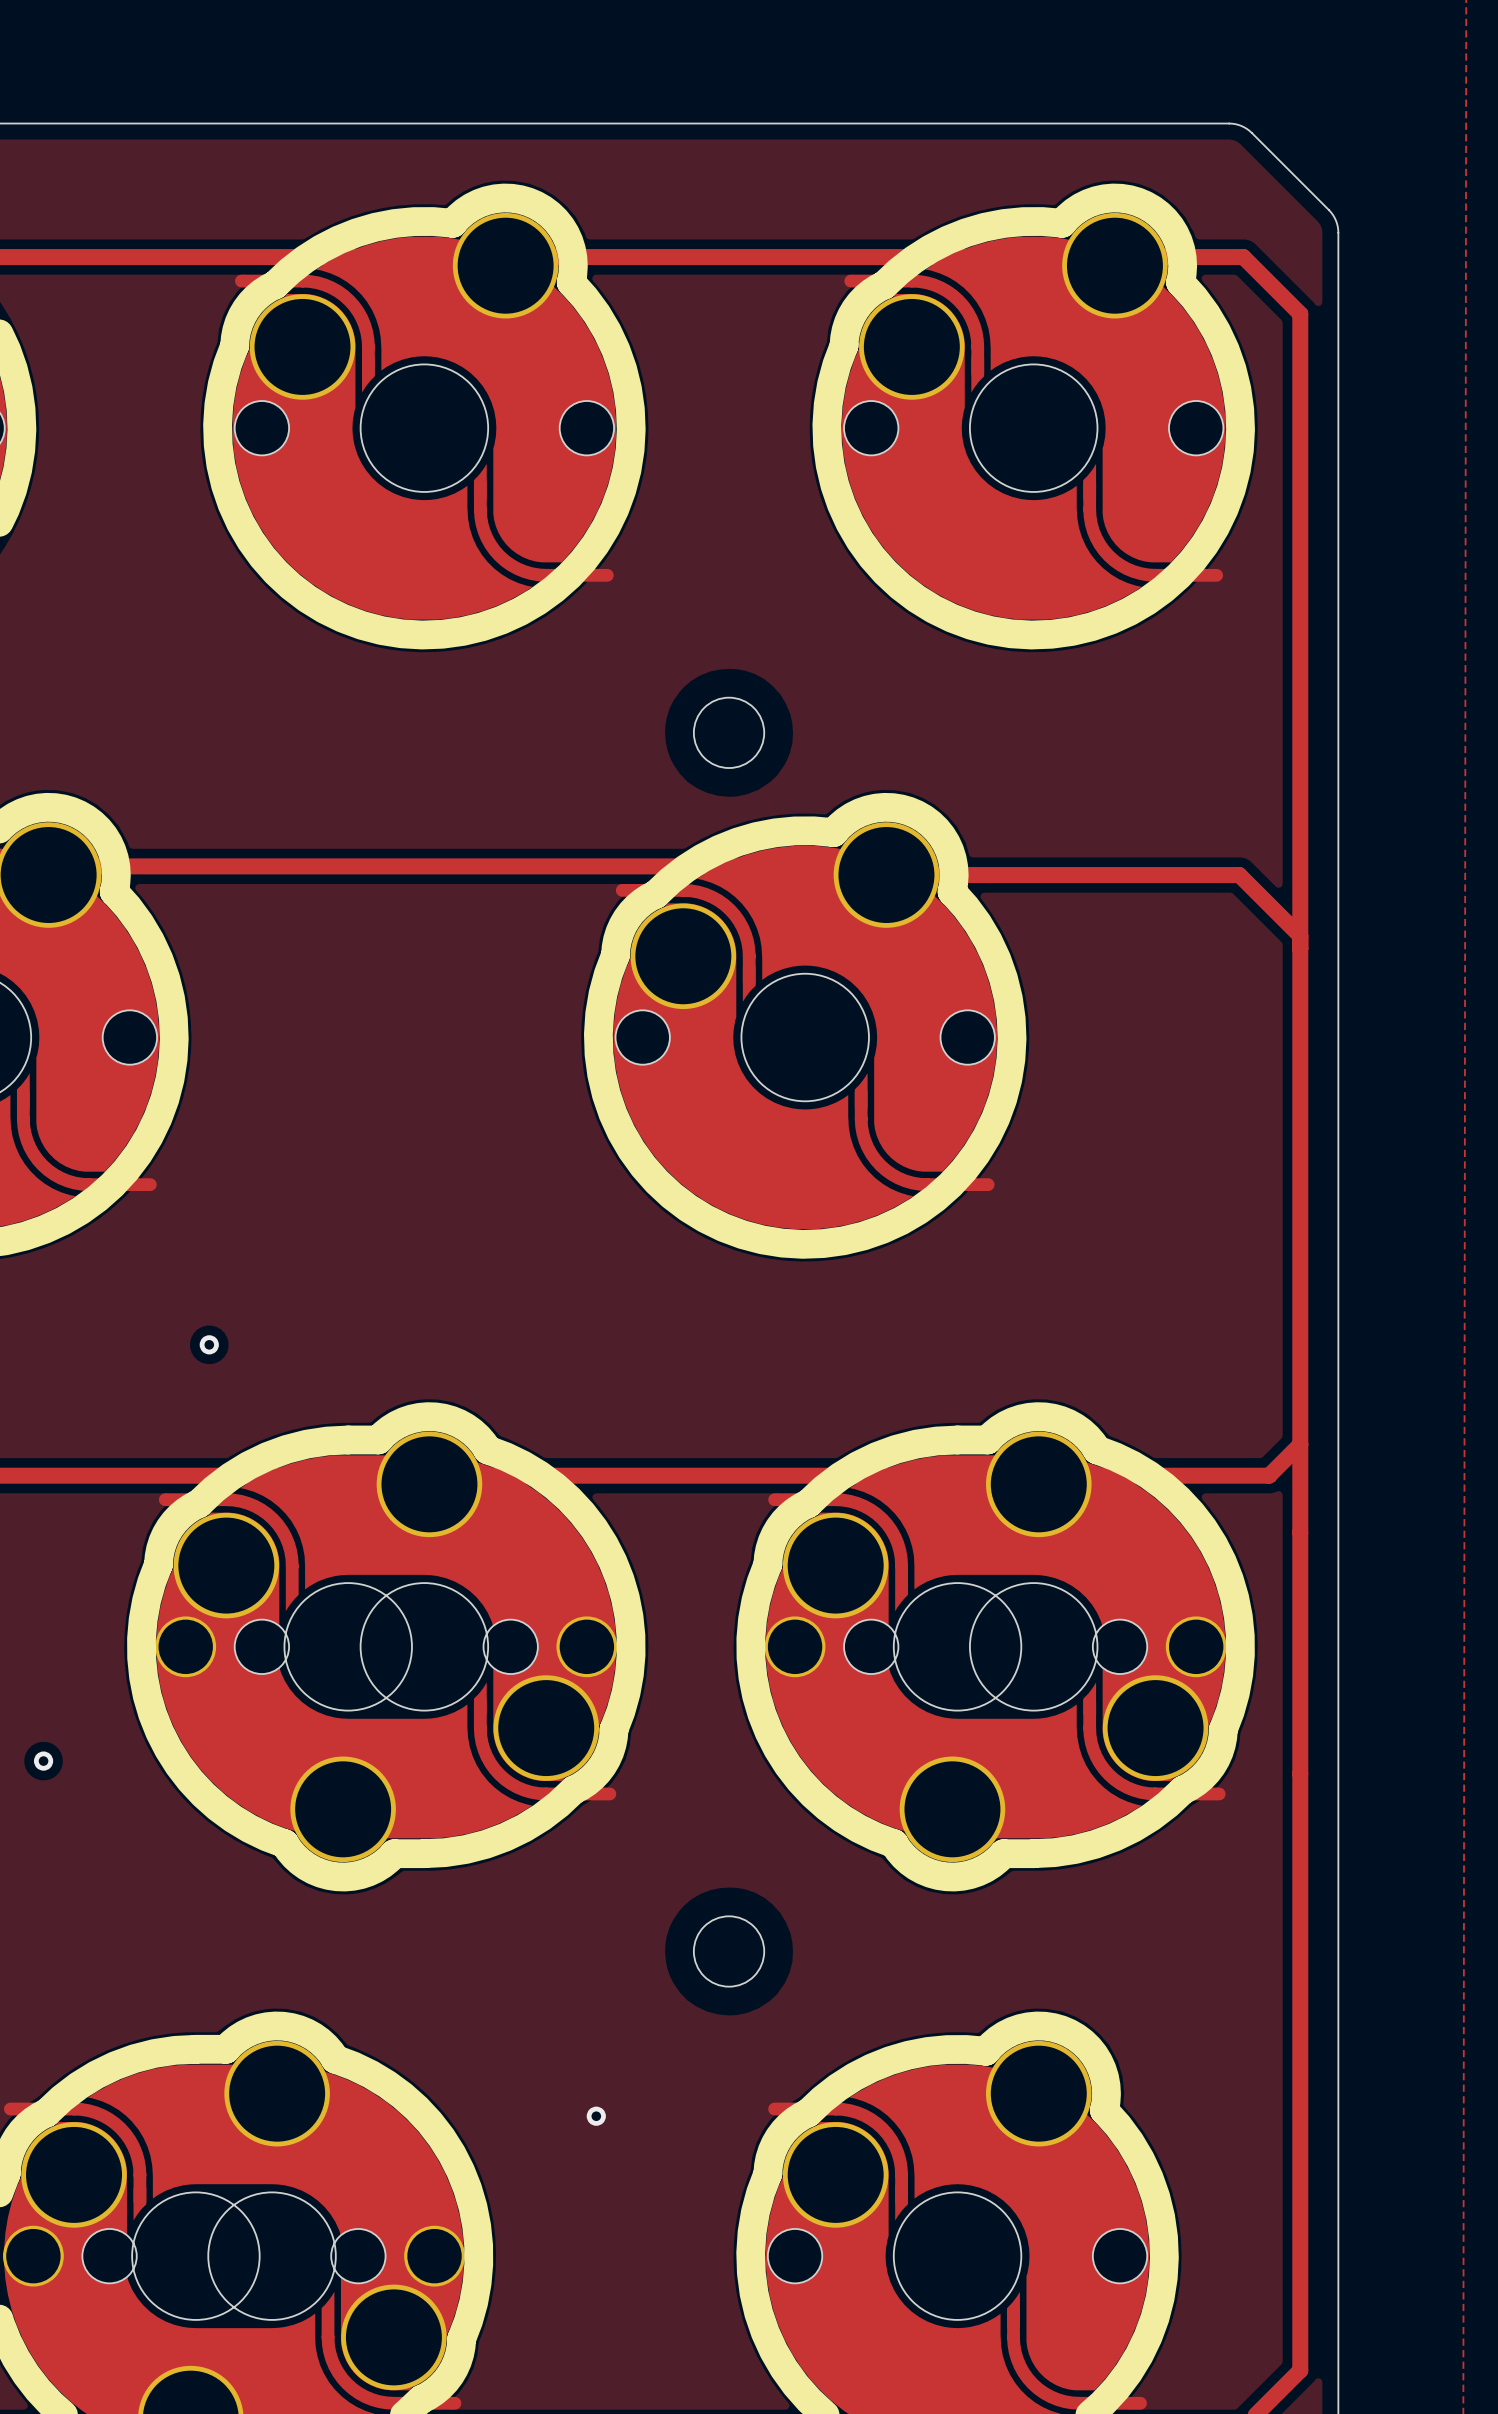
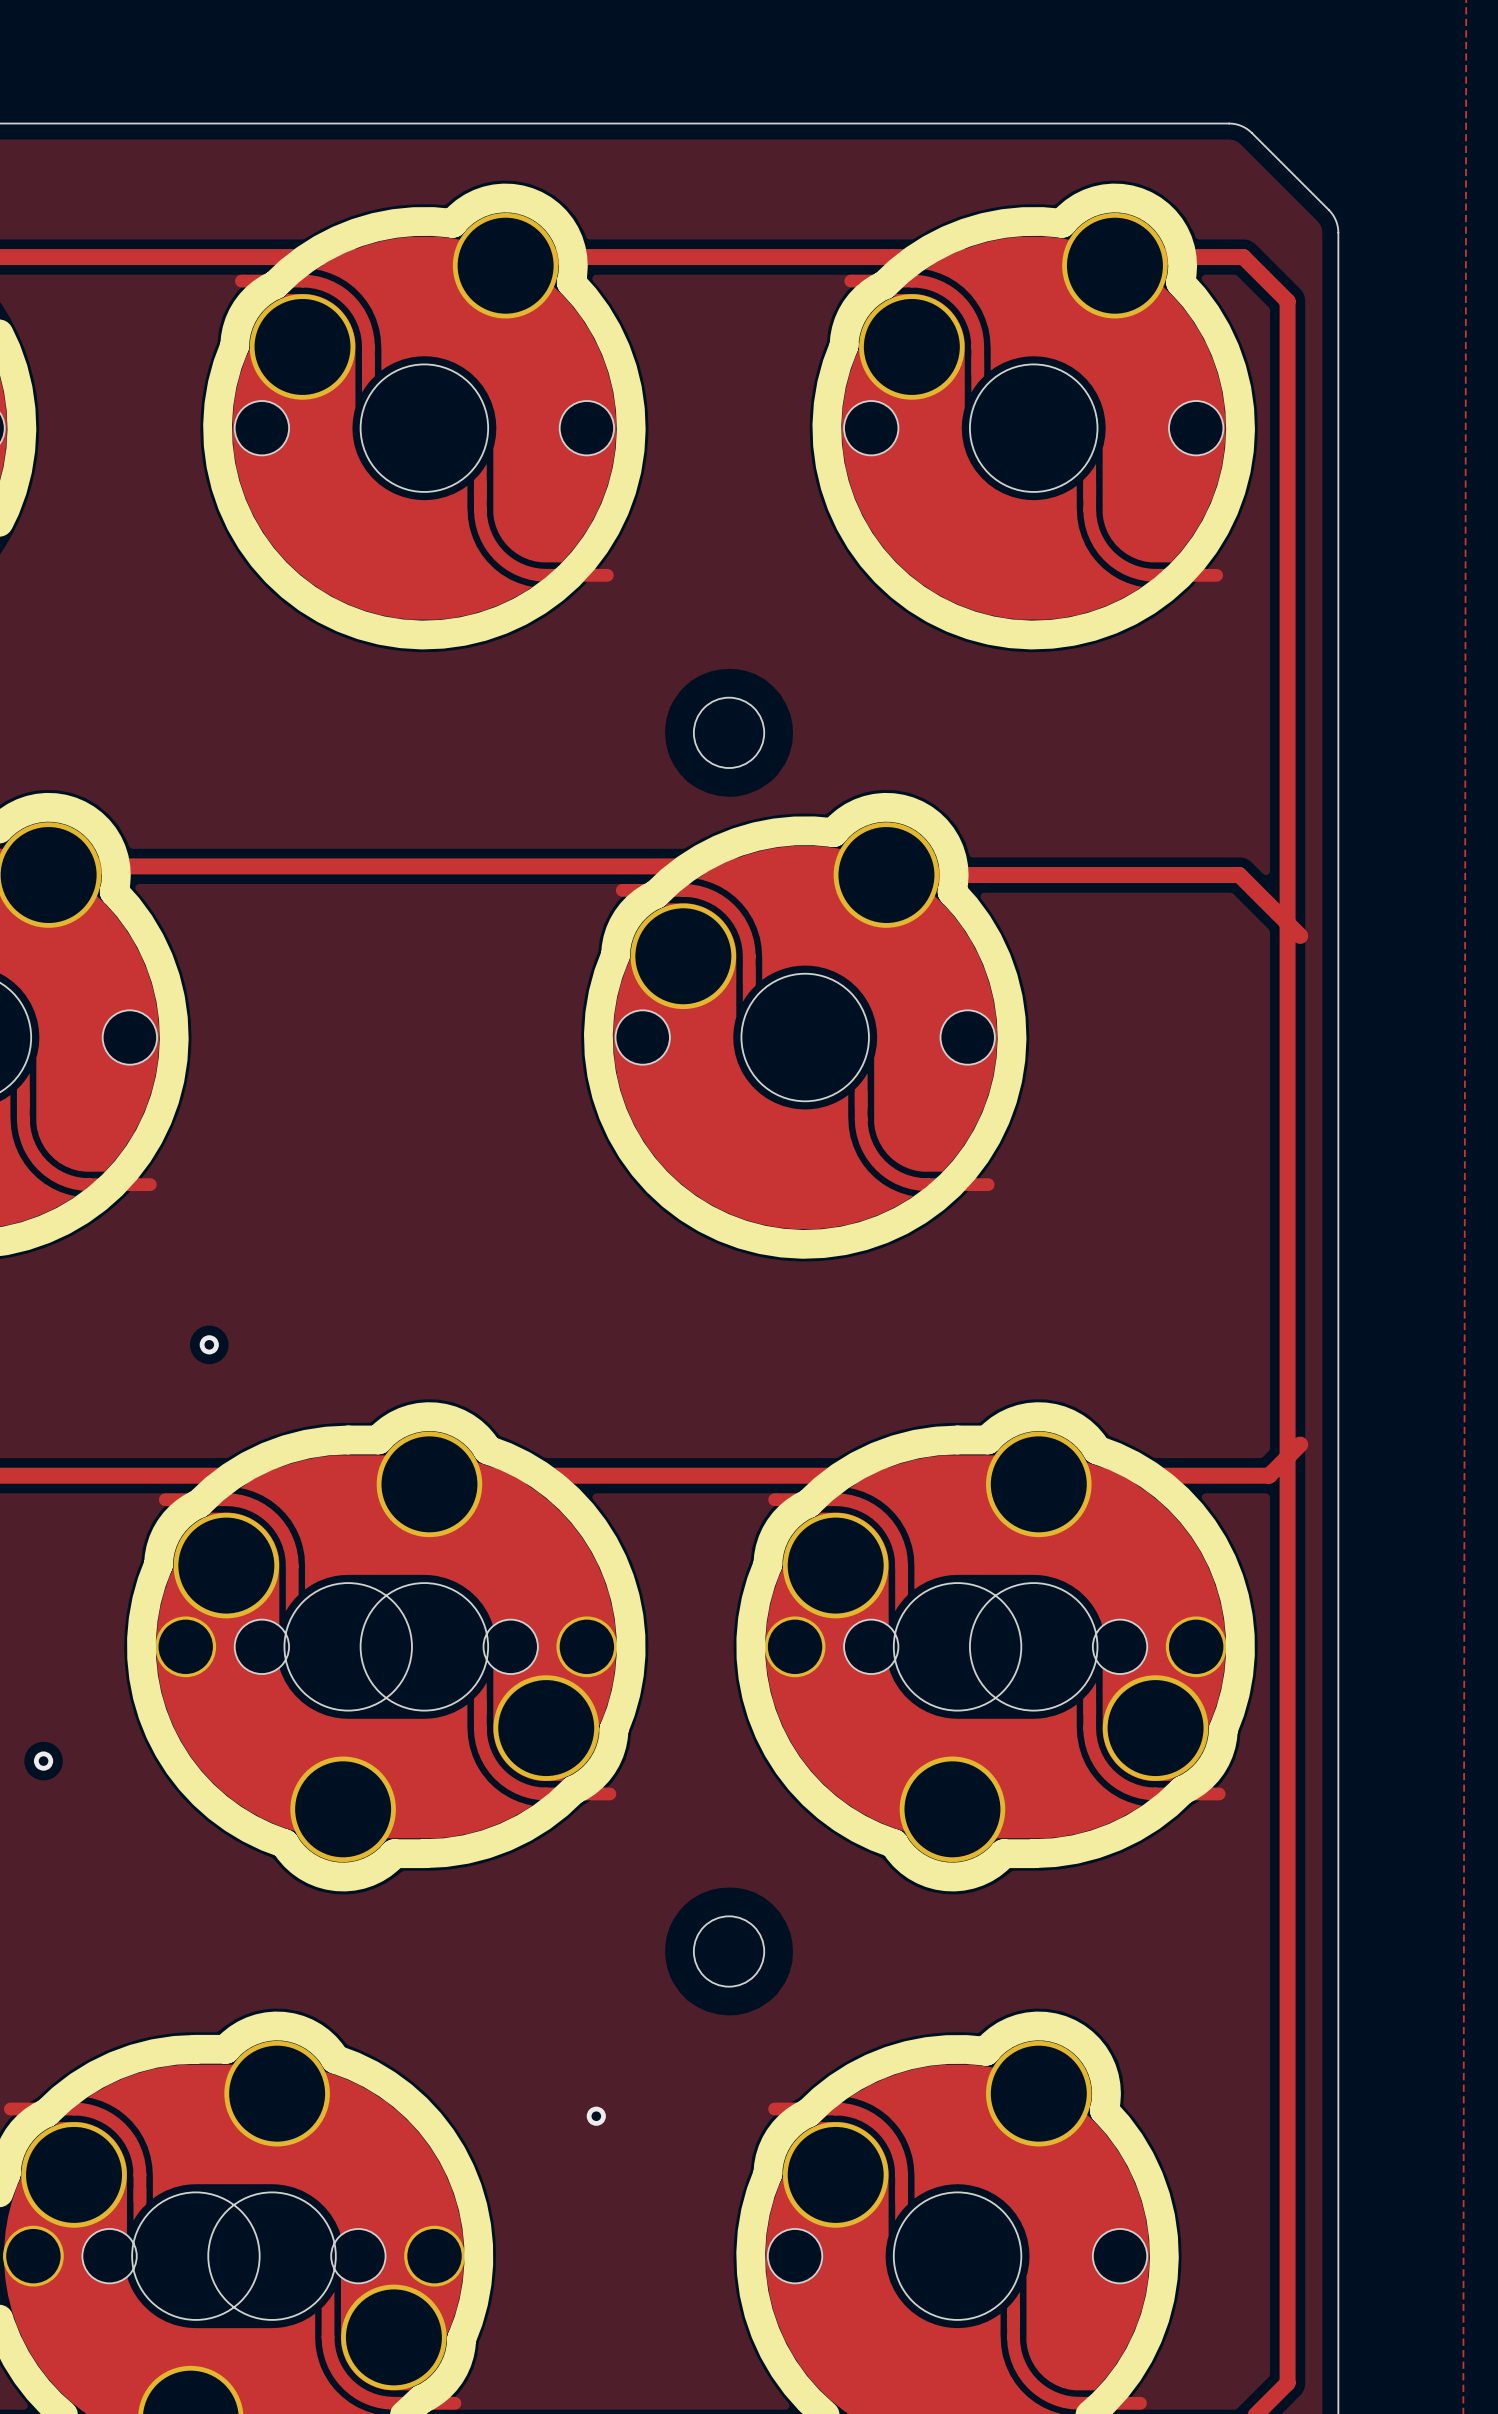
track: (1287, 301) (1300, 313) (1300, 2370) (1287, 2383) -> (1287, 301) (1287, 2383)

